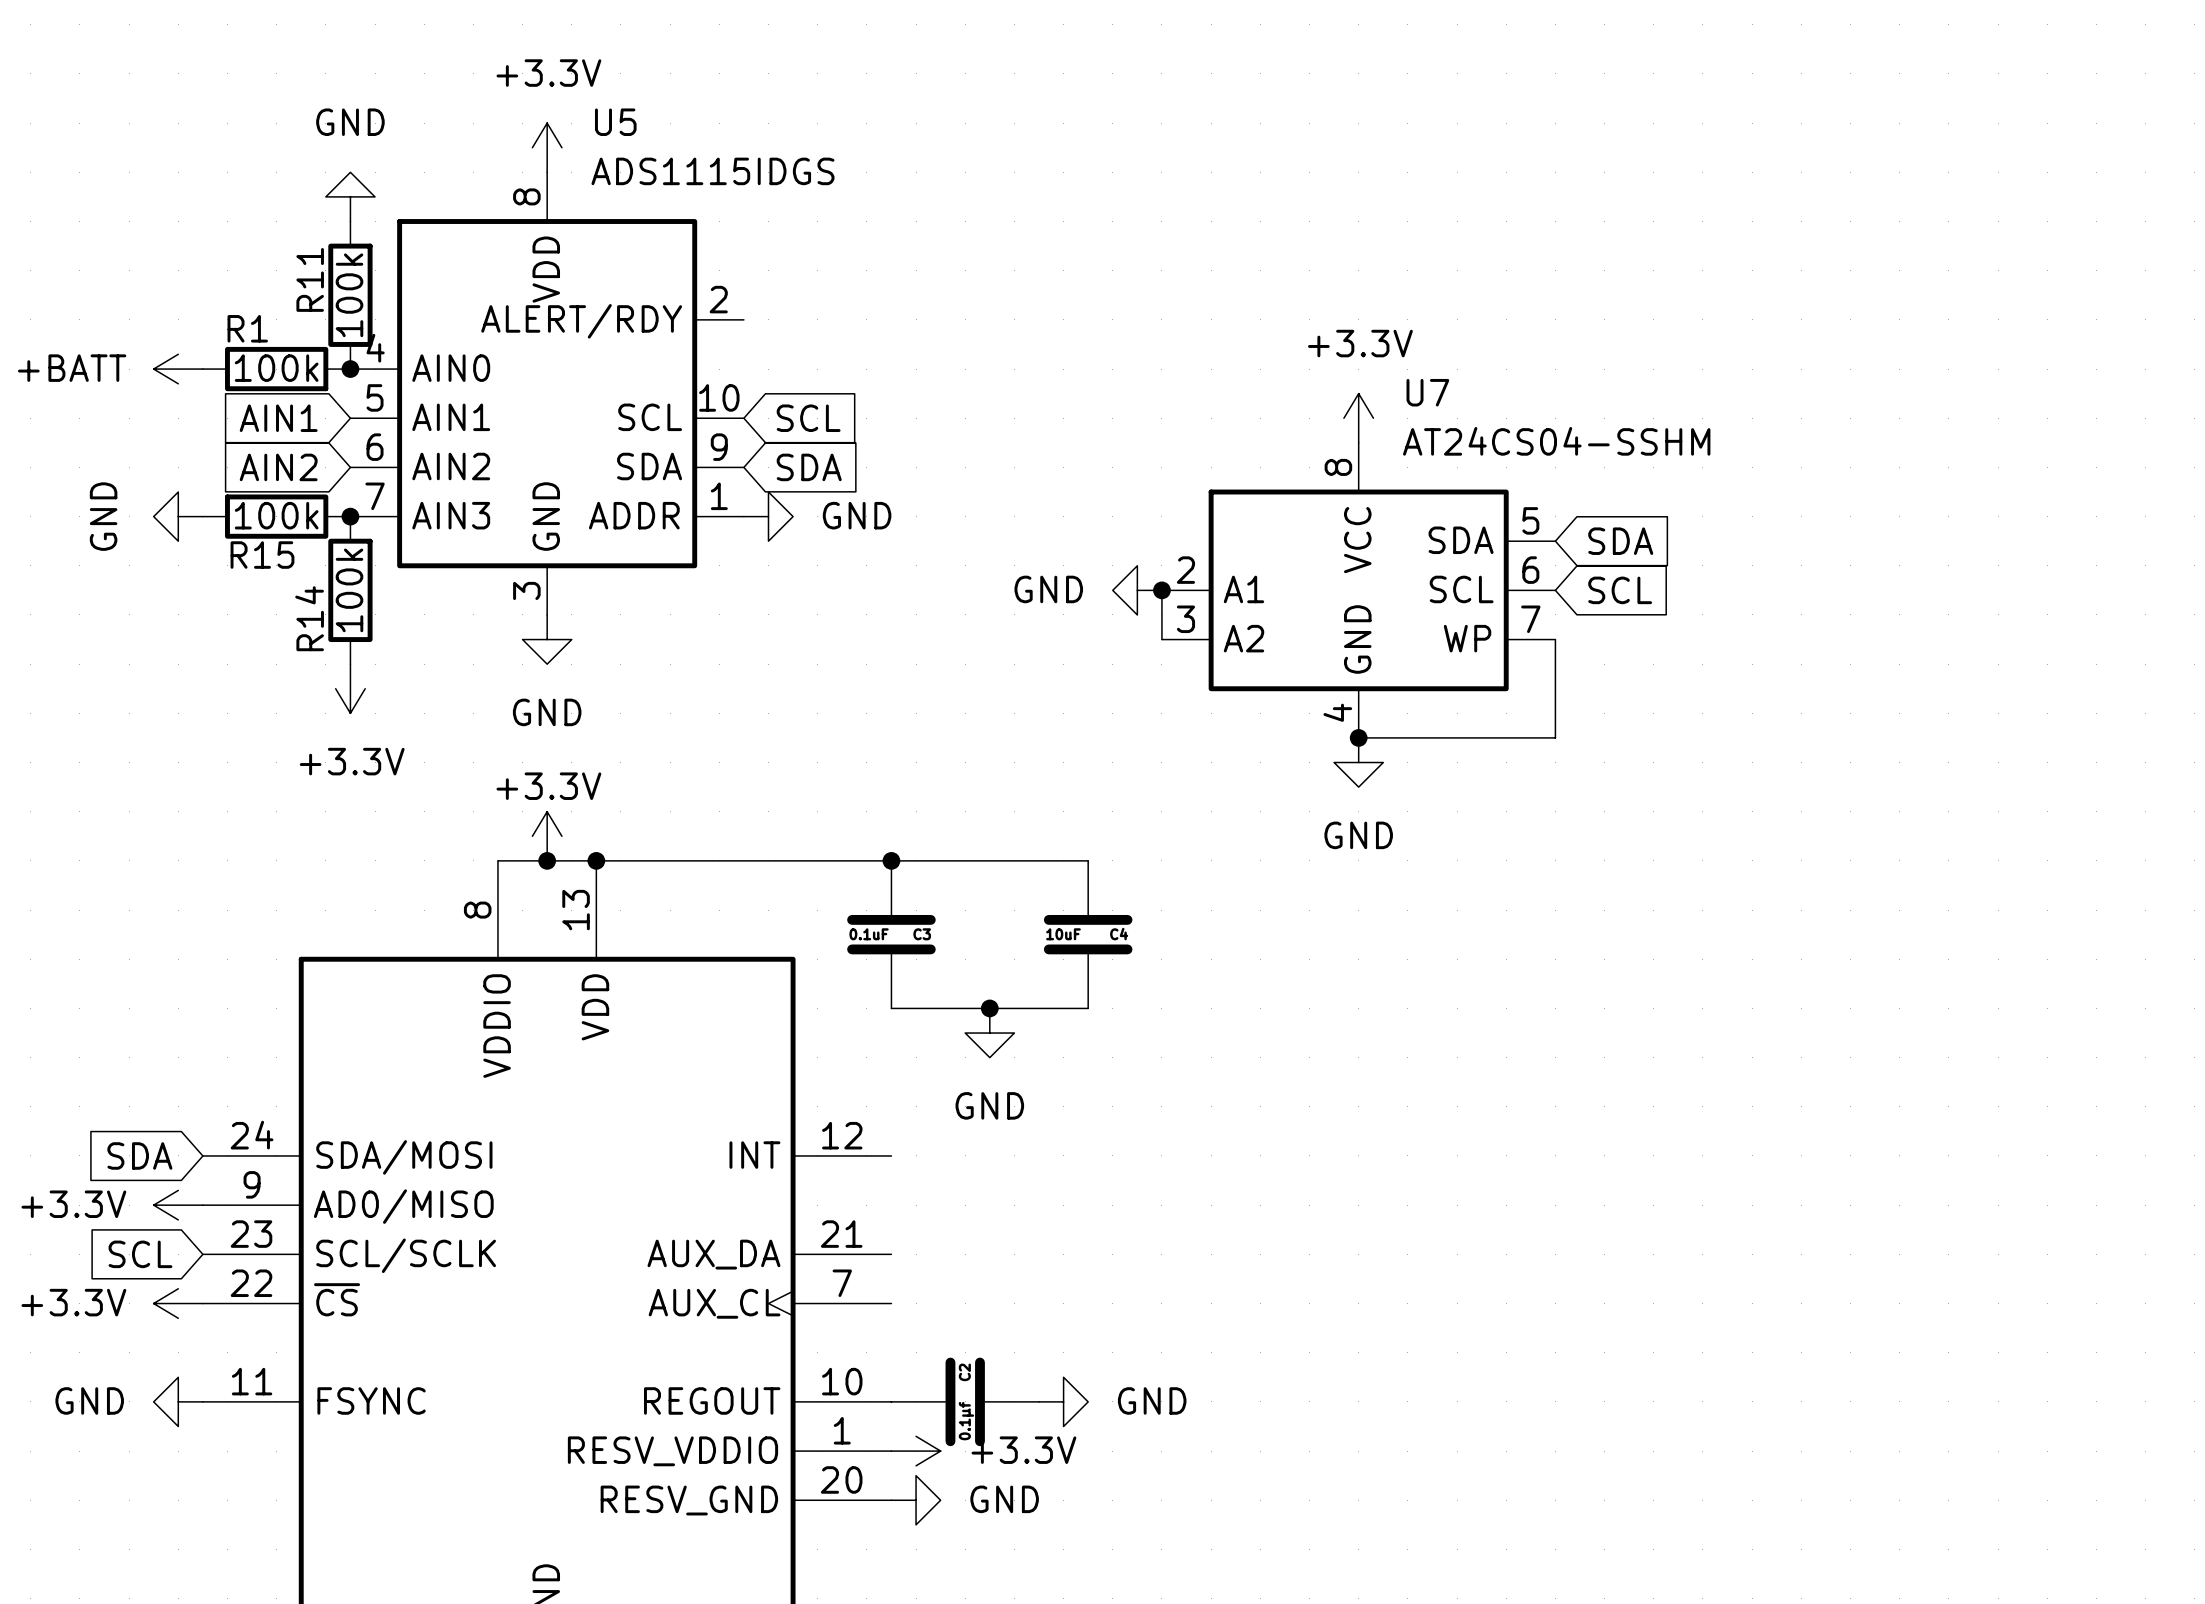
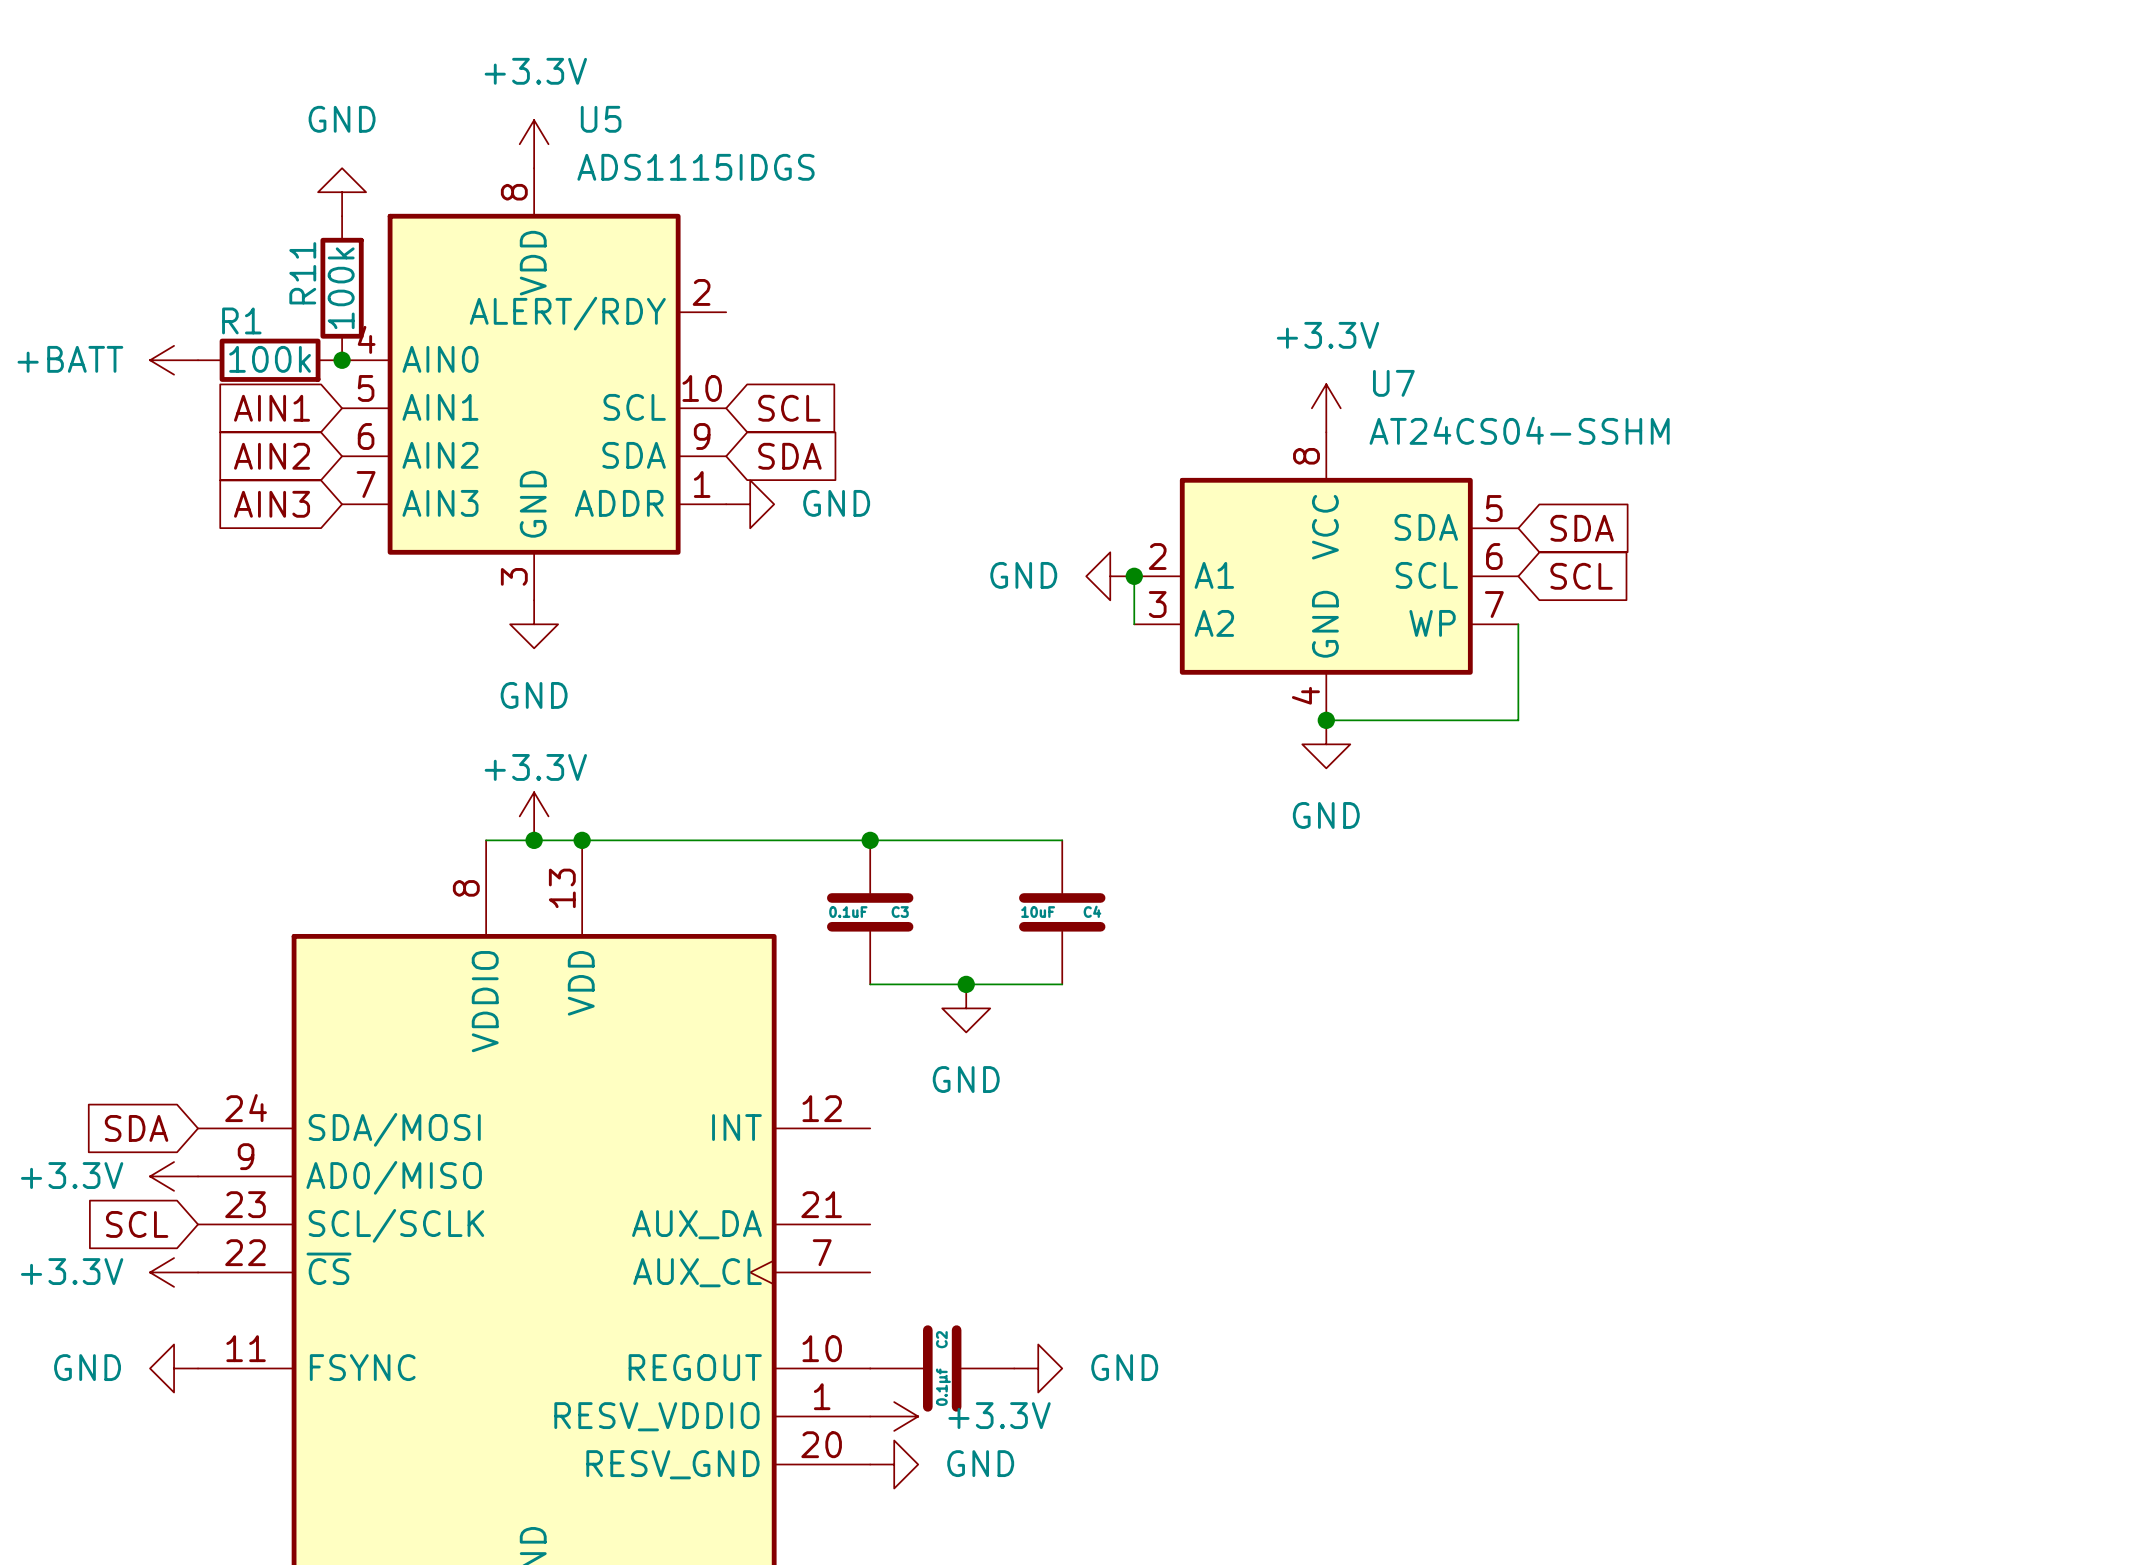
power symbol: GND (178, 516) -> none
R15: 100k (276, 516) -> none
global label: none -> AIN3 (272, 504)
junction: (350, 516) -> none
R14: 100k (350, 590) -> none
power symbol: +3.3V (350, 688) -> none

